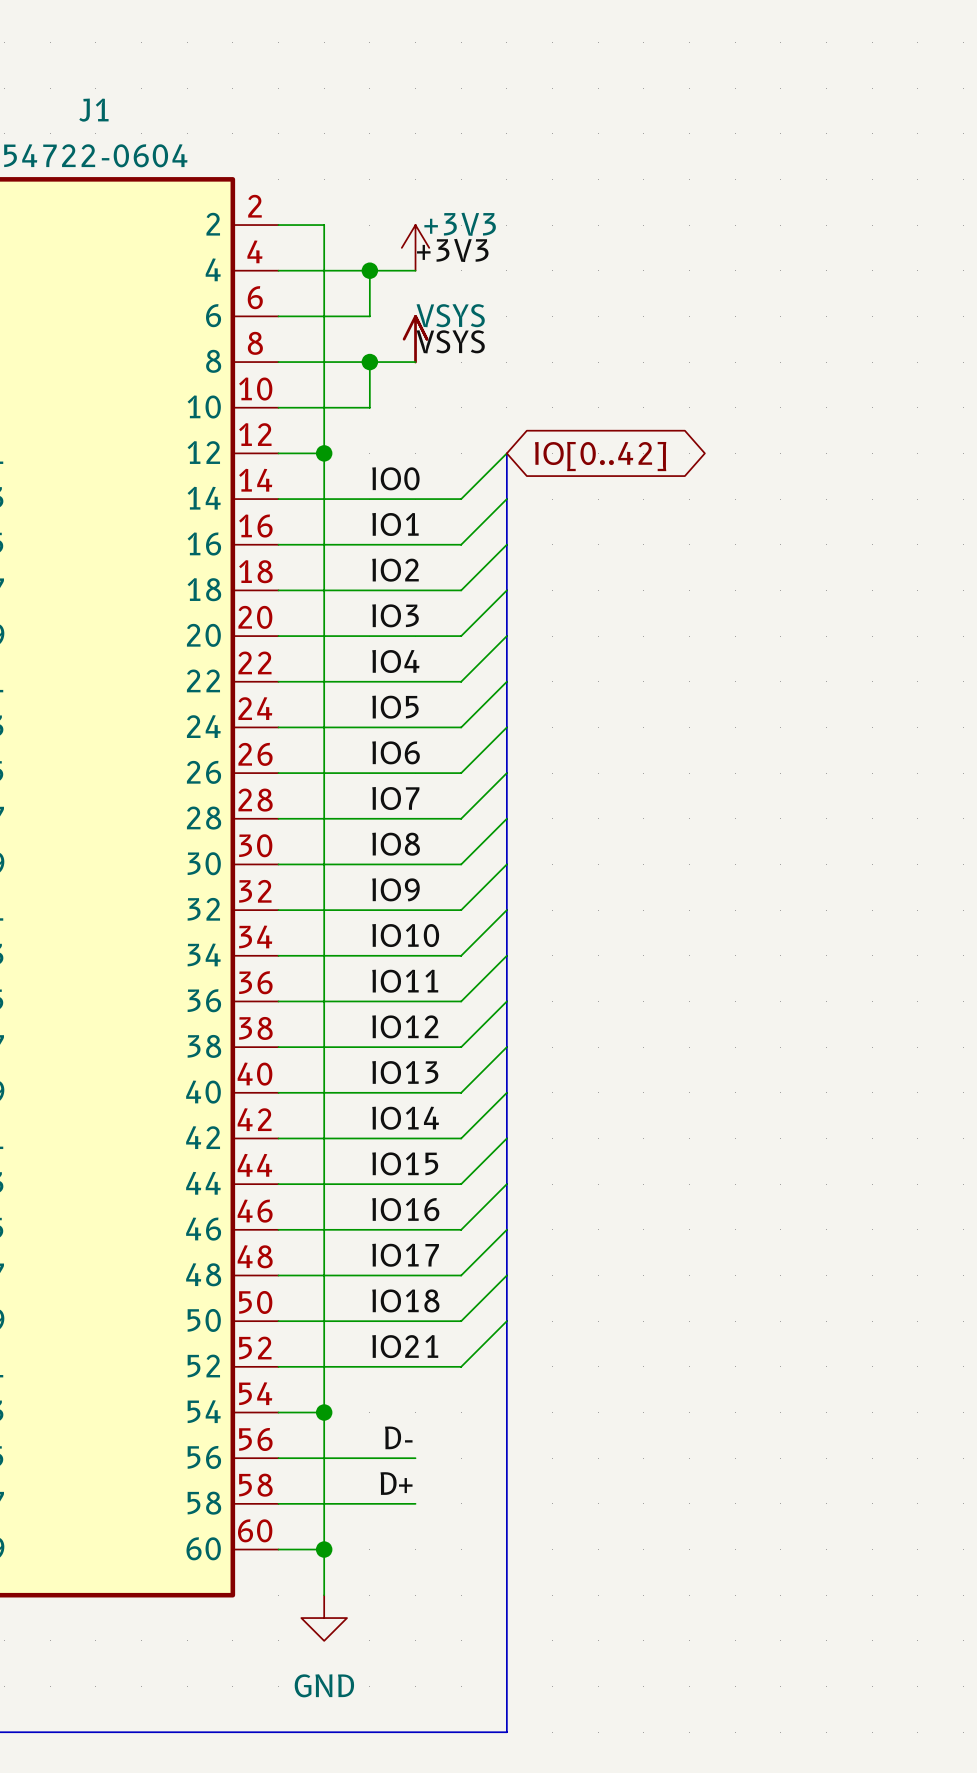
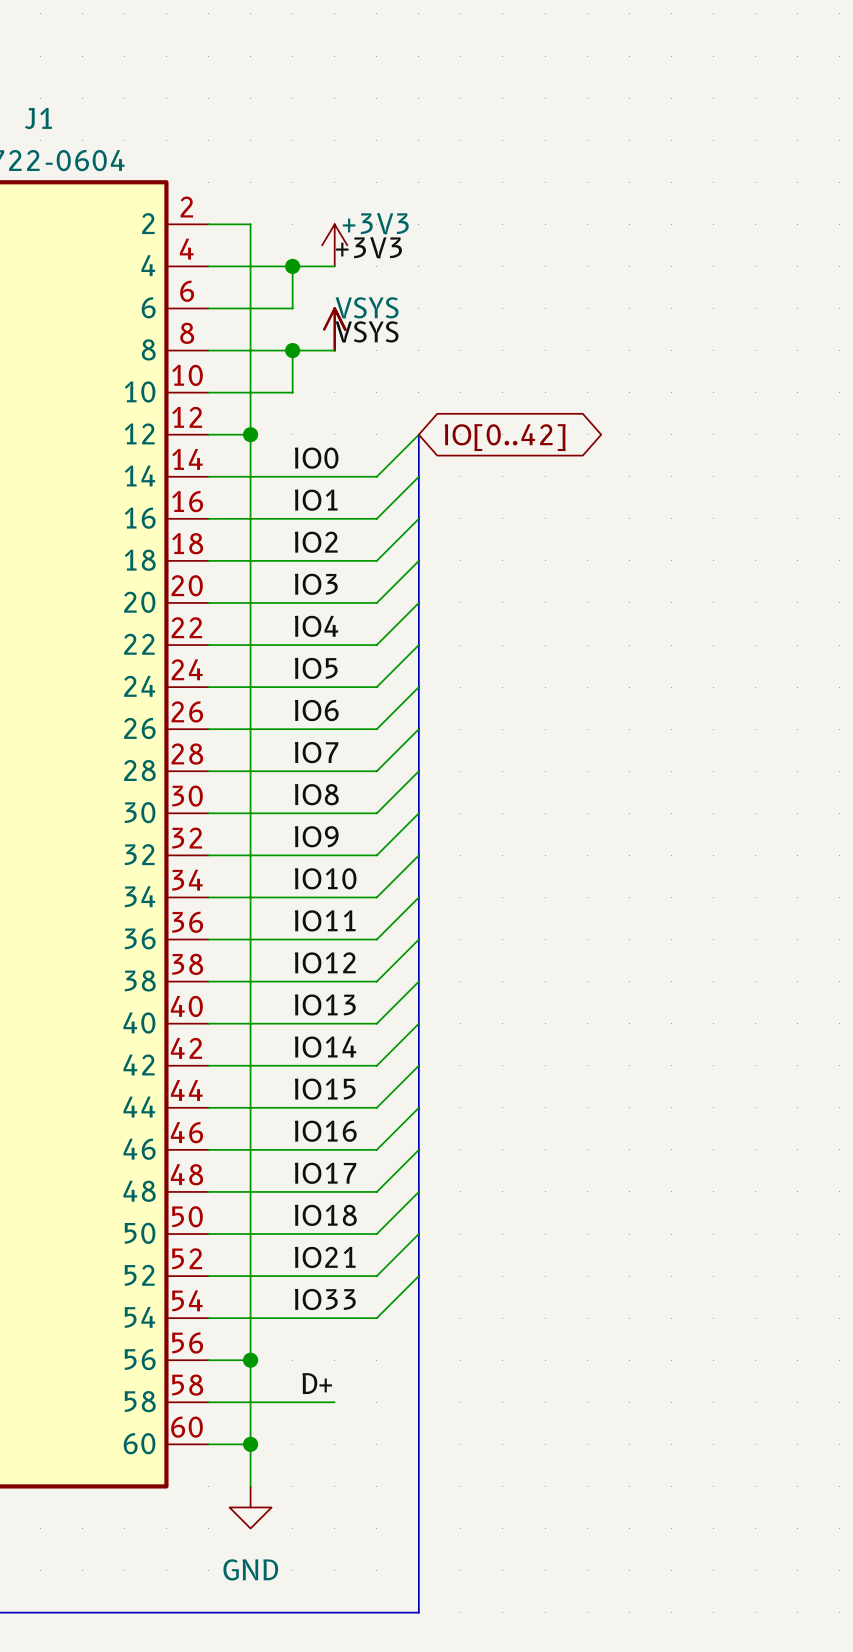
wire: none -> (418, 1276) (376, 1318) (250, 1318)
label: none -> IO33 (325, 1299)
junction position: (324, 1412) -> (250, 1360)
label: D- (398, 1437) -> none
wire: (324, 1458) (415, 1458) -> none

